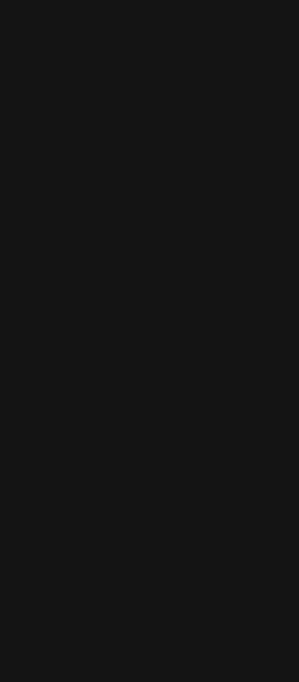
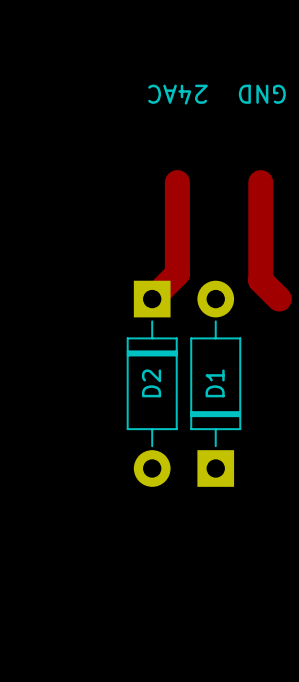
text: none -> 24AC (178, 94)
text: none -> GND (262, 94)
track: none -> (177, 182) (177, 273) (152, 299)
track: none -> (260, 182) (260, 280) (279, 299)
D2: none -> (152, 383)
D1: none -> (215, 383)

